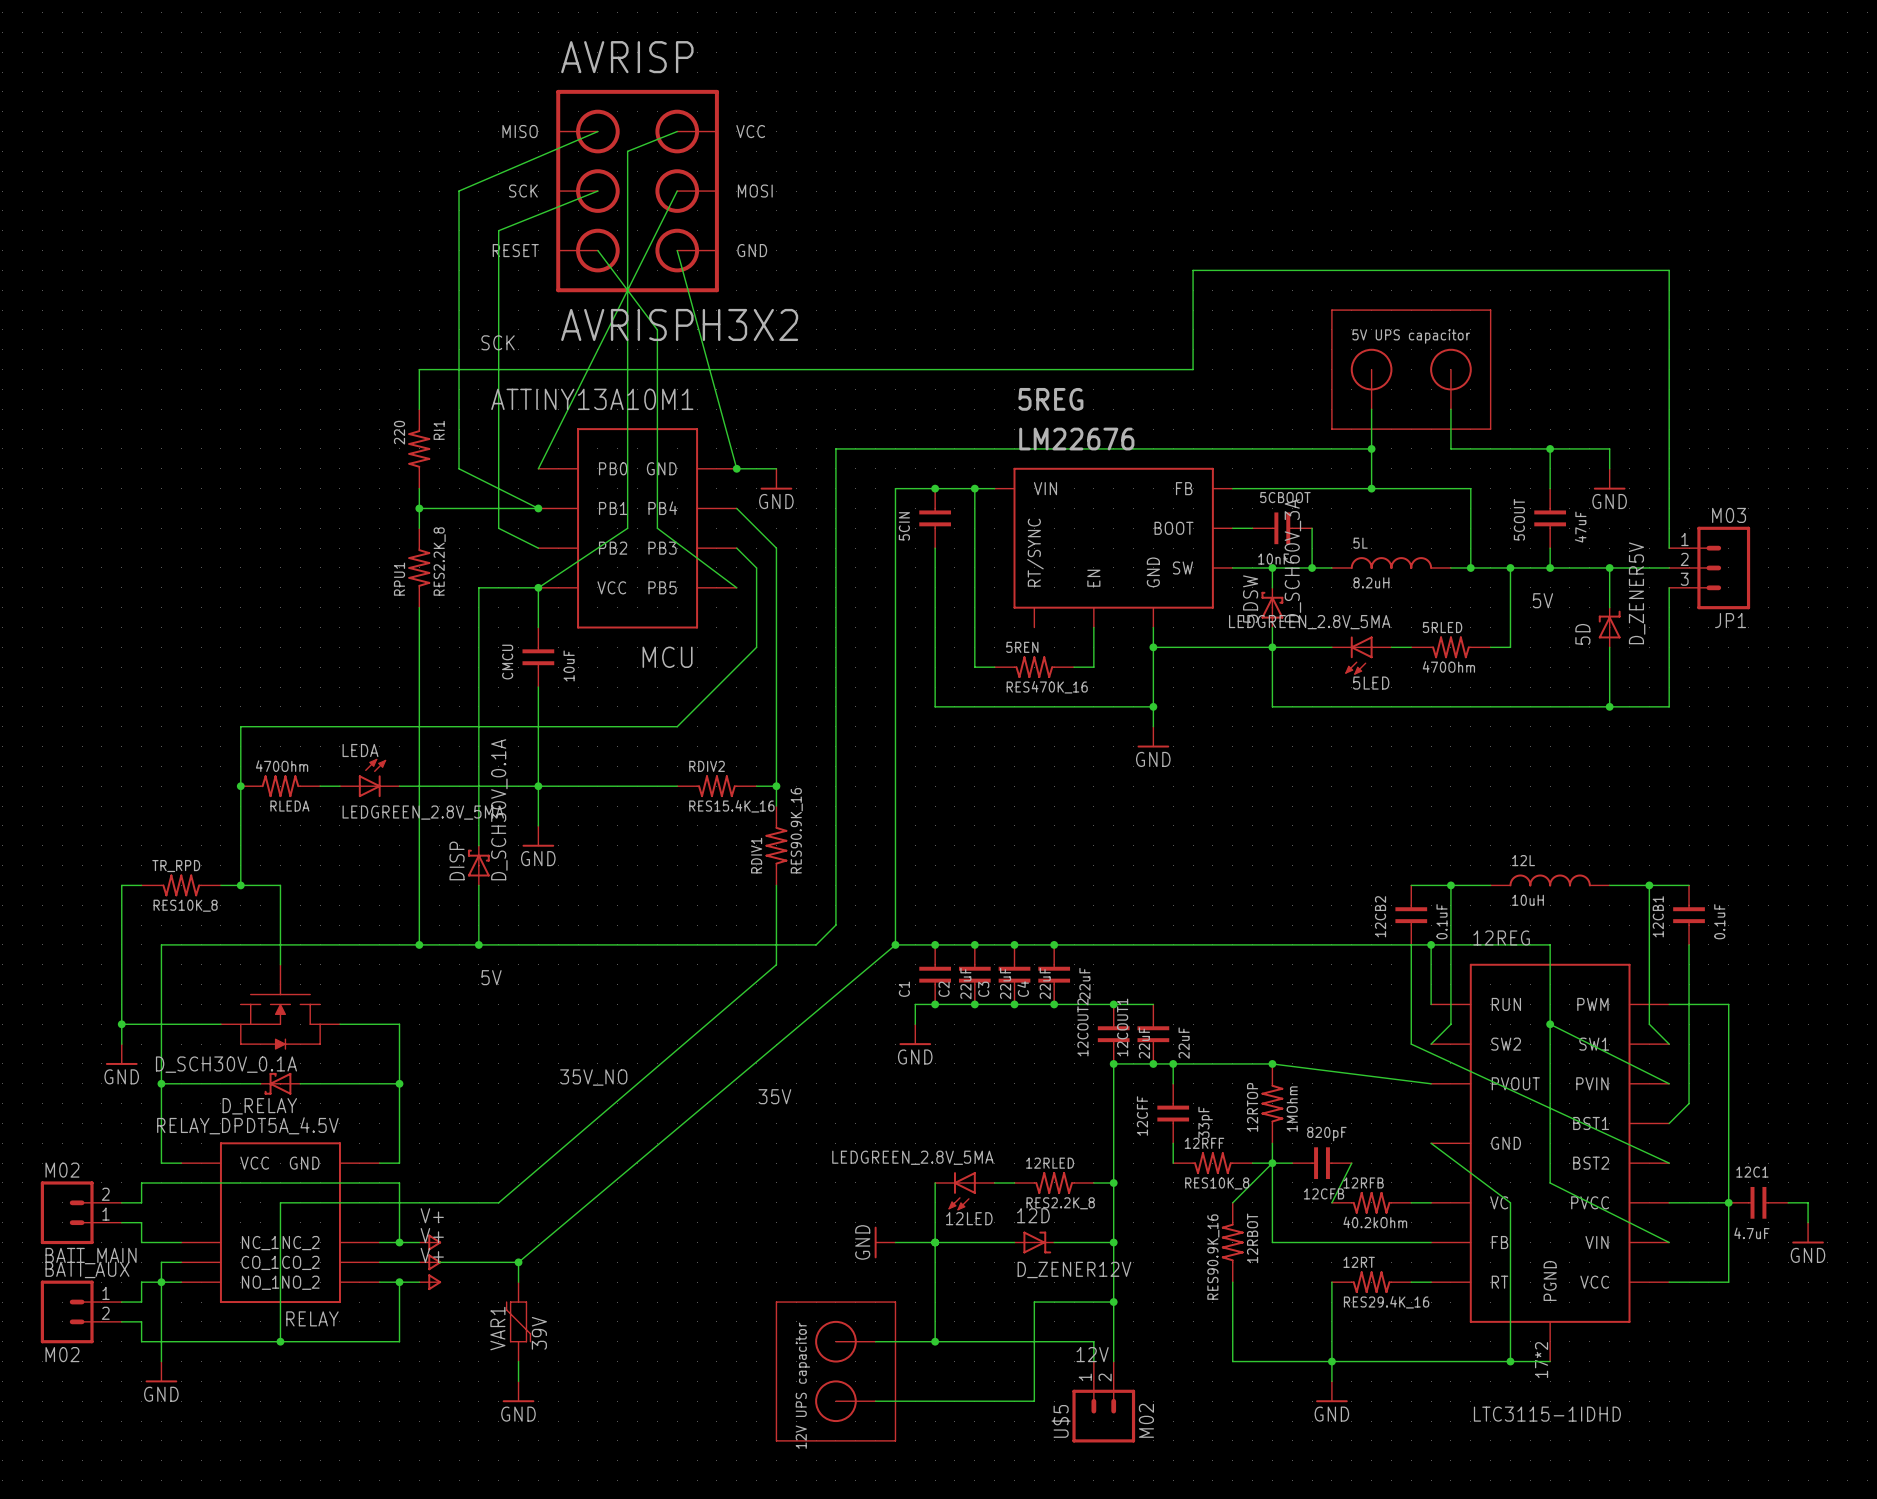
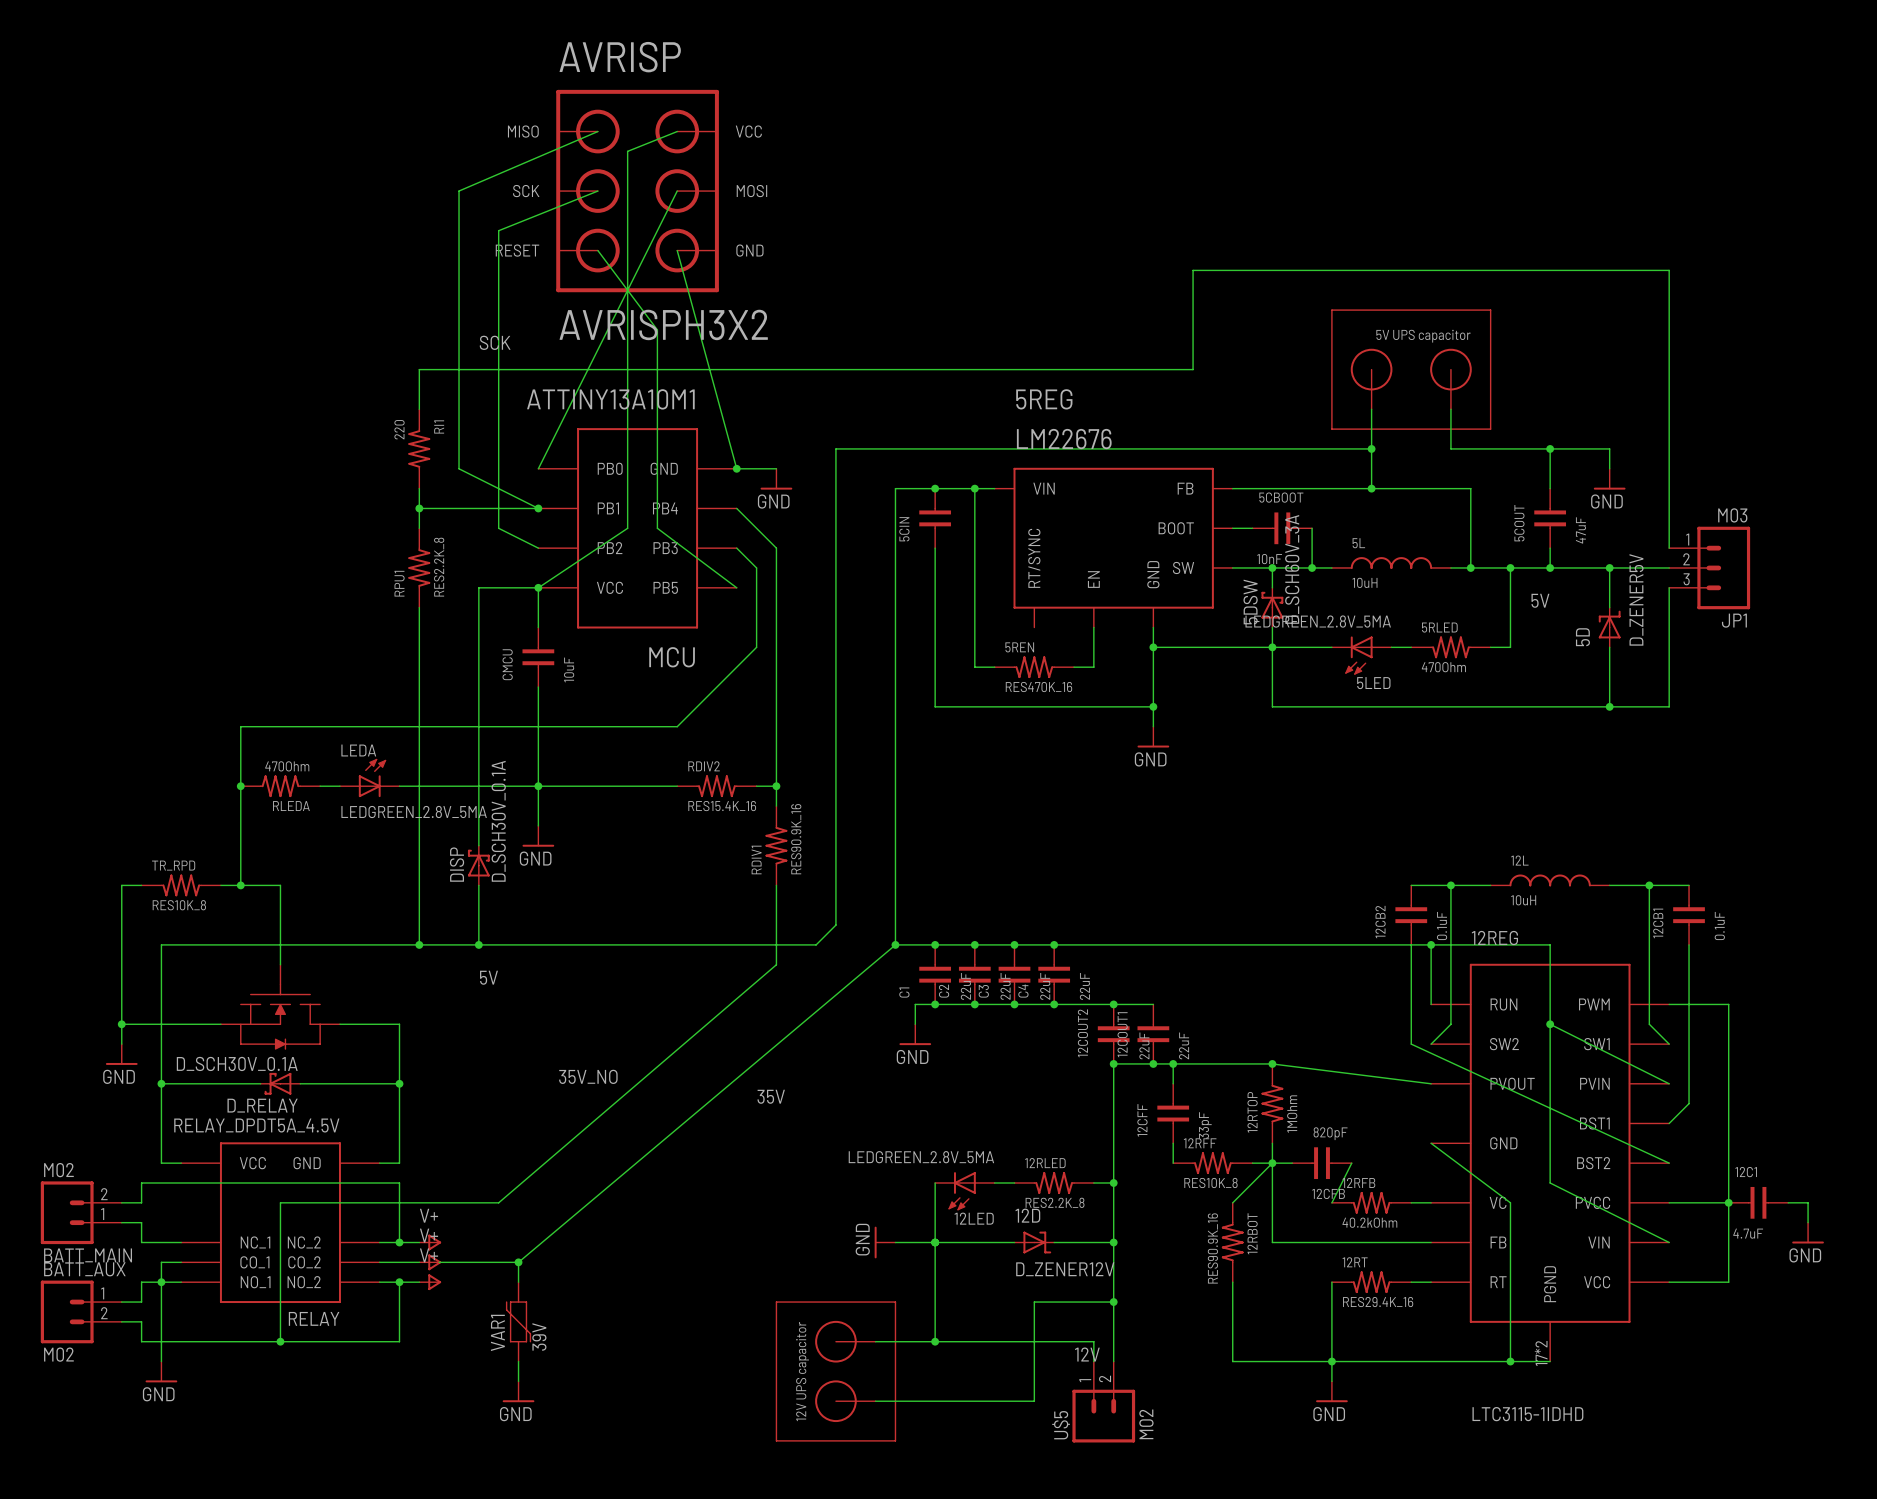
5L value: 8.2uH (1371, 582) -> 10uH (1364, 582)

